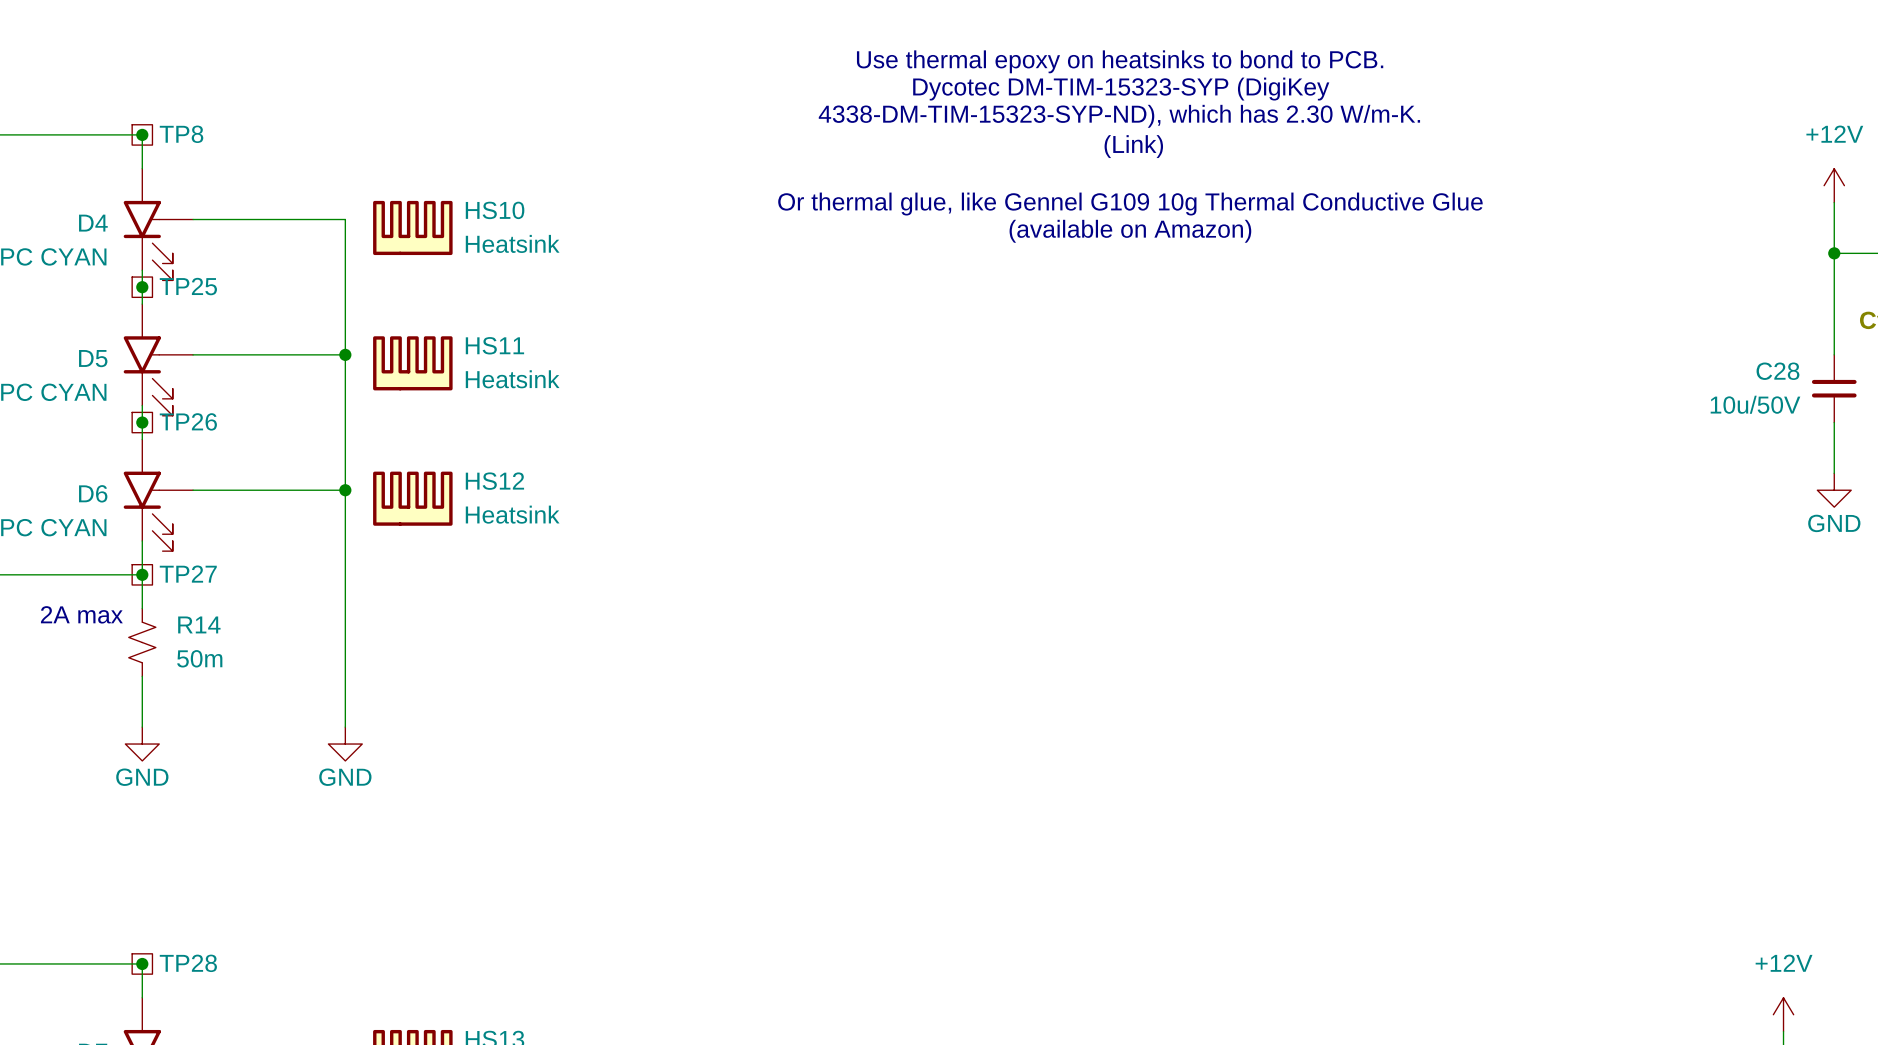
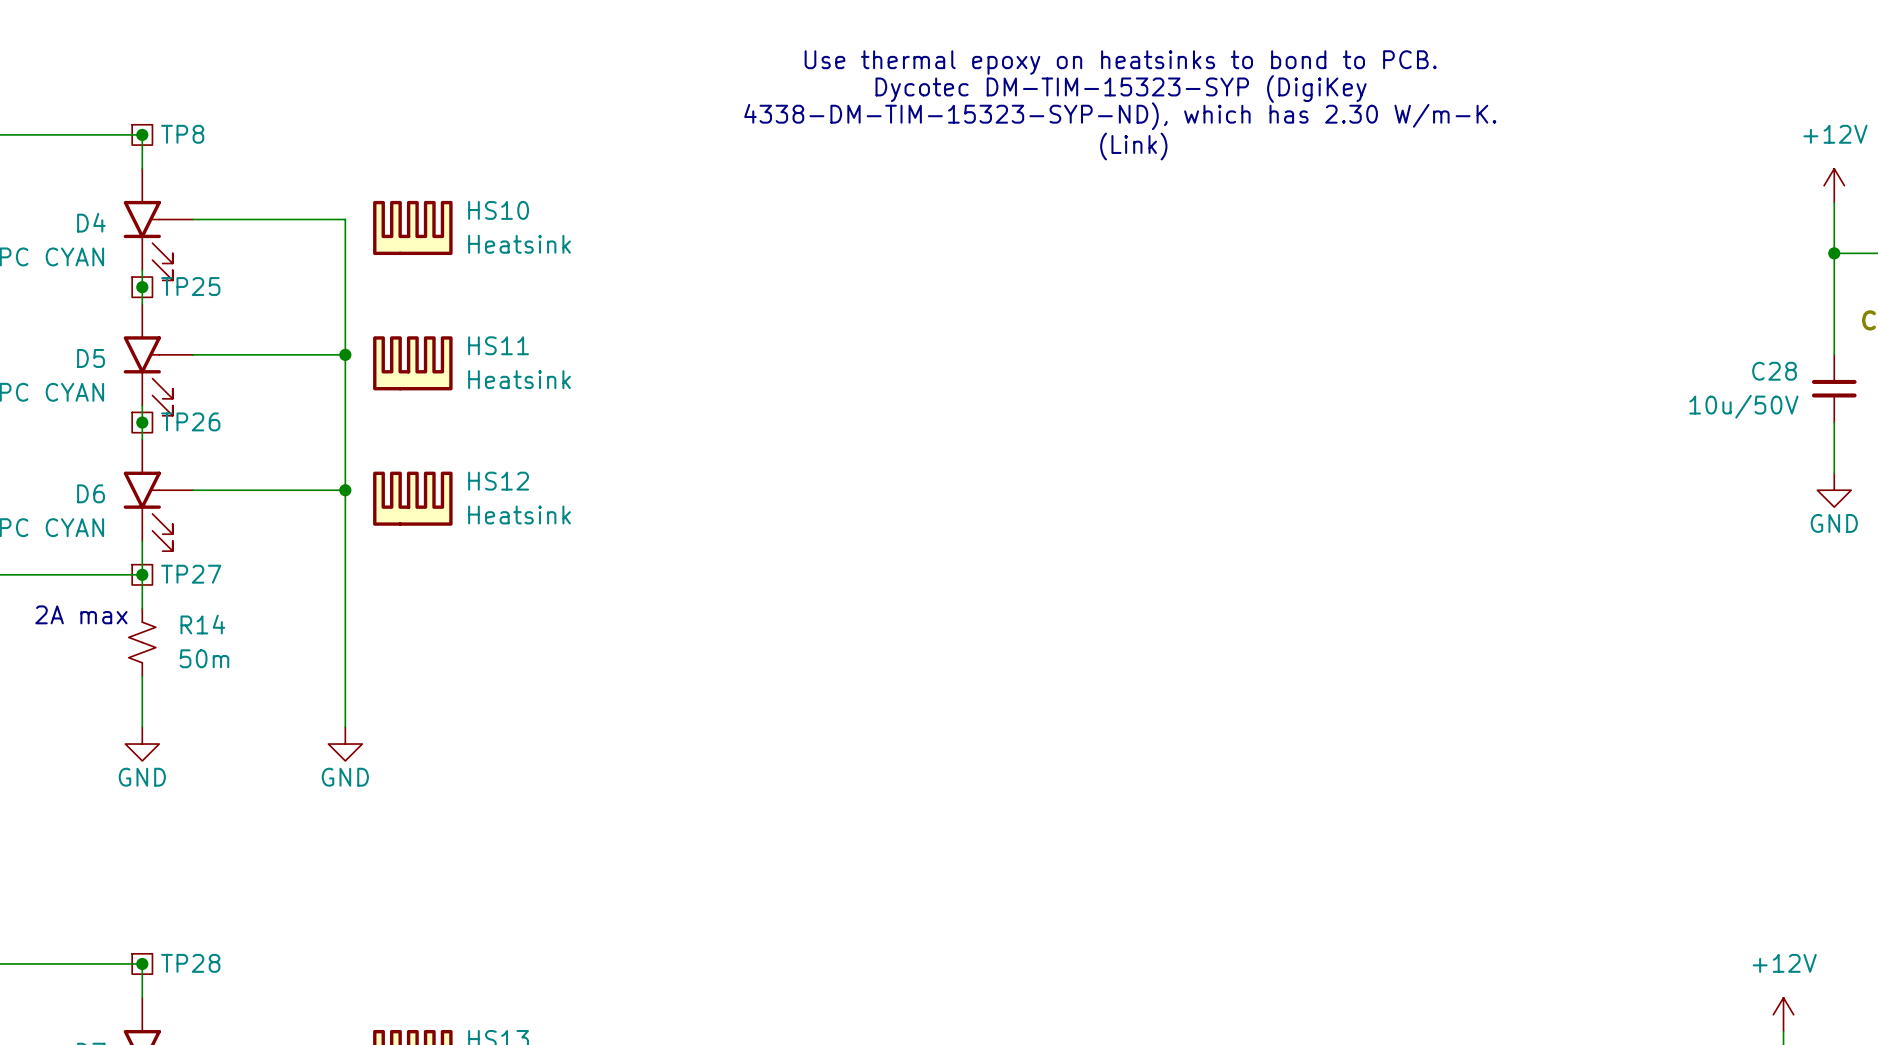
text: Or thermal glue, like Gennel G109 10g Thermal Conductive Glue (1130, 204) -> none
text: (available on Amazon) (1130, 231) -> none

